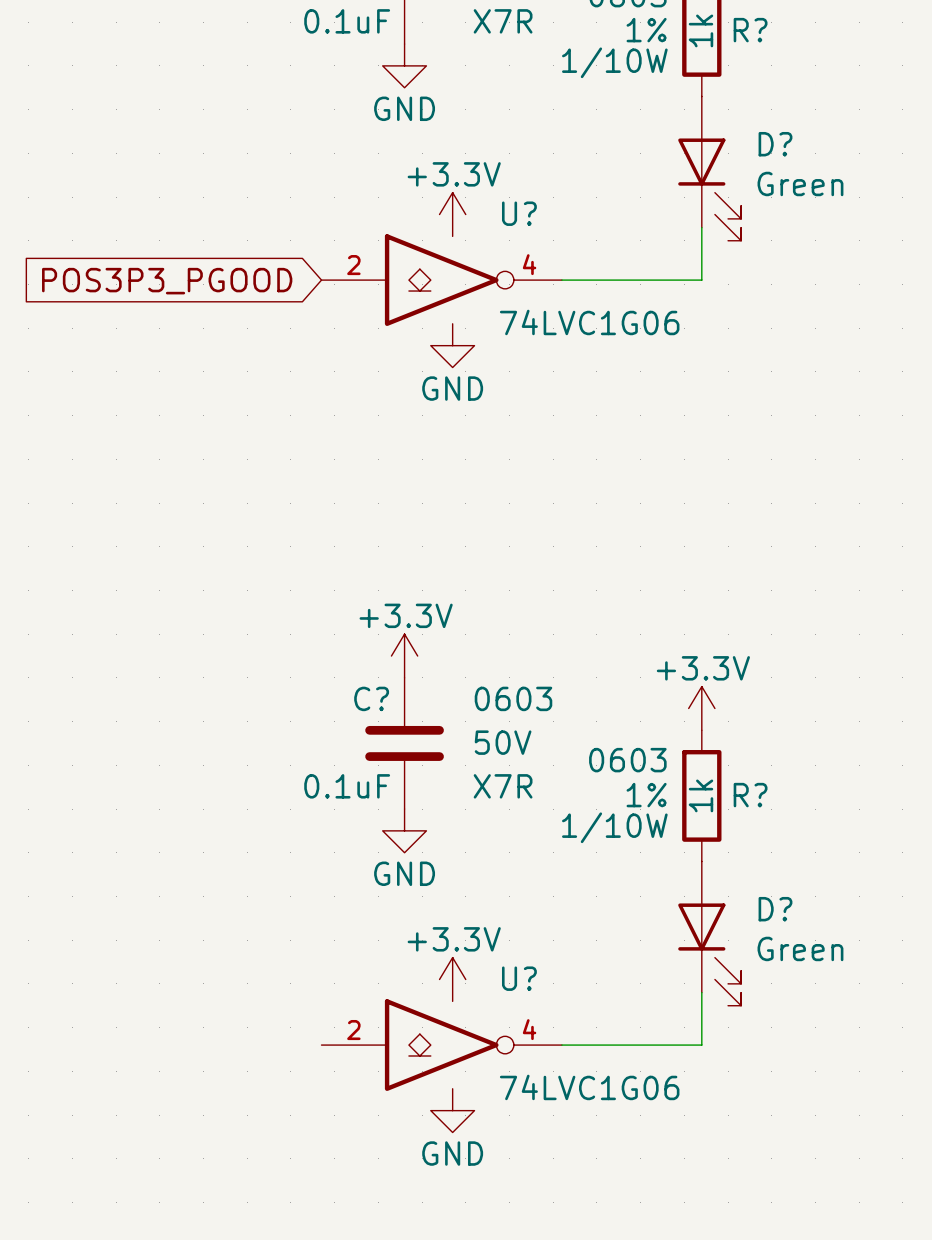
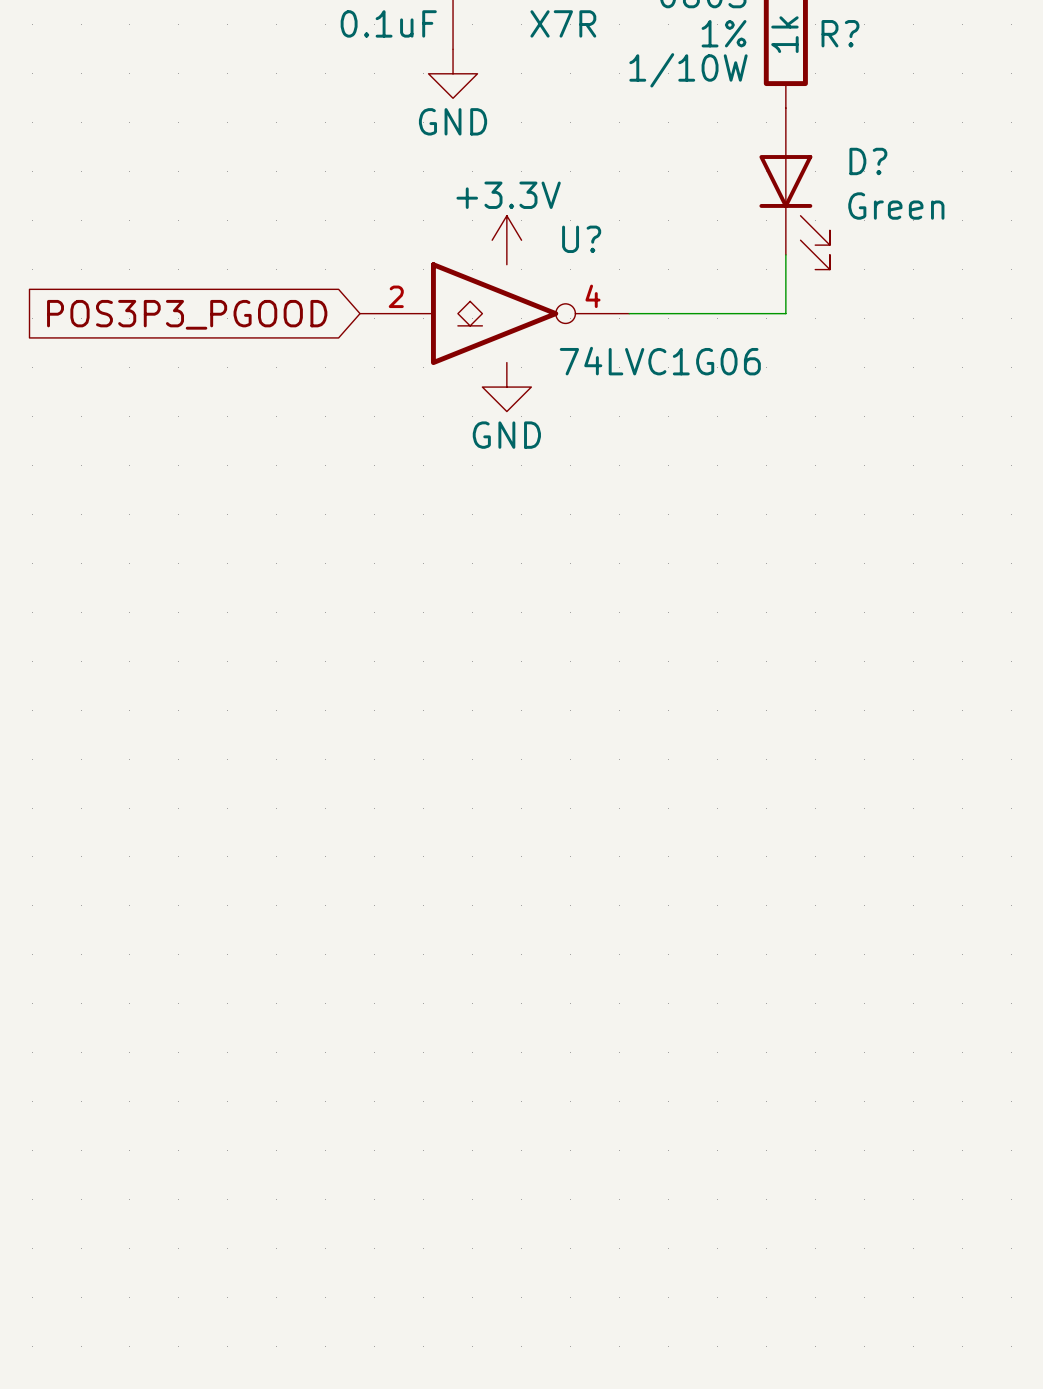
power symbol: +3.3V (404, 656) -> none
power symbol: +3.3V (701, 708) -> none
C?: 0.1uF (404, 743) -> none
R?: 1k (701, 795) -> none
power symbol: GND (404, 830) -> none
D?: Green (709, 933) -> none
power symbol: +3.3V (452, 979) -> none
wire: (701, 992) (701, 1045) (561, 1045) -> none
U?: 74LVC1G06 (441, 1045) -> none
power symbol: GND (452, 1110) -> none

